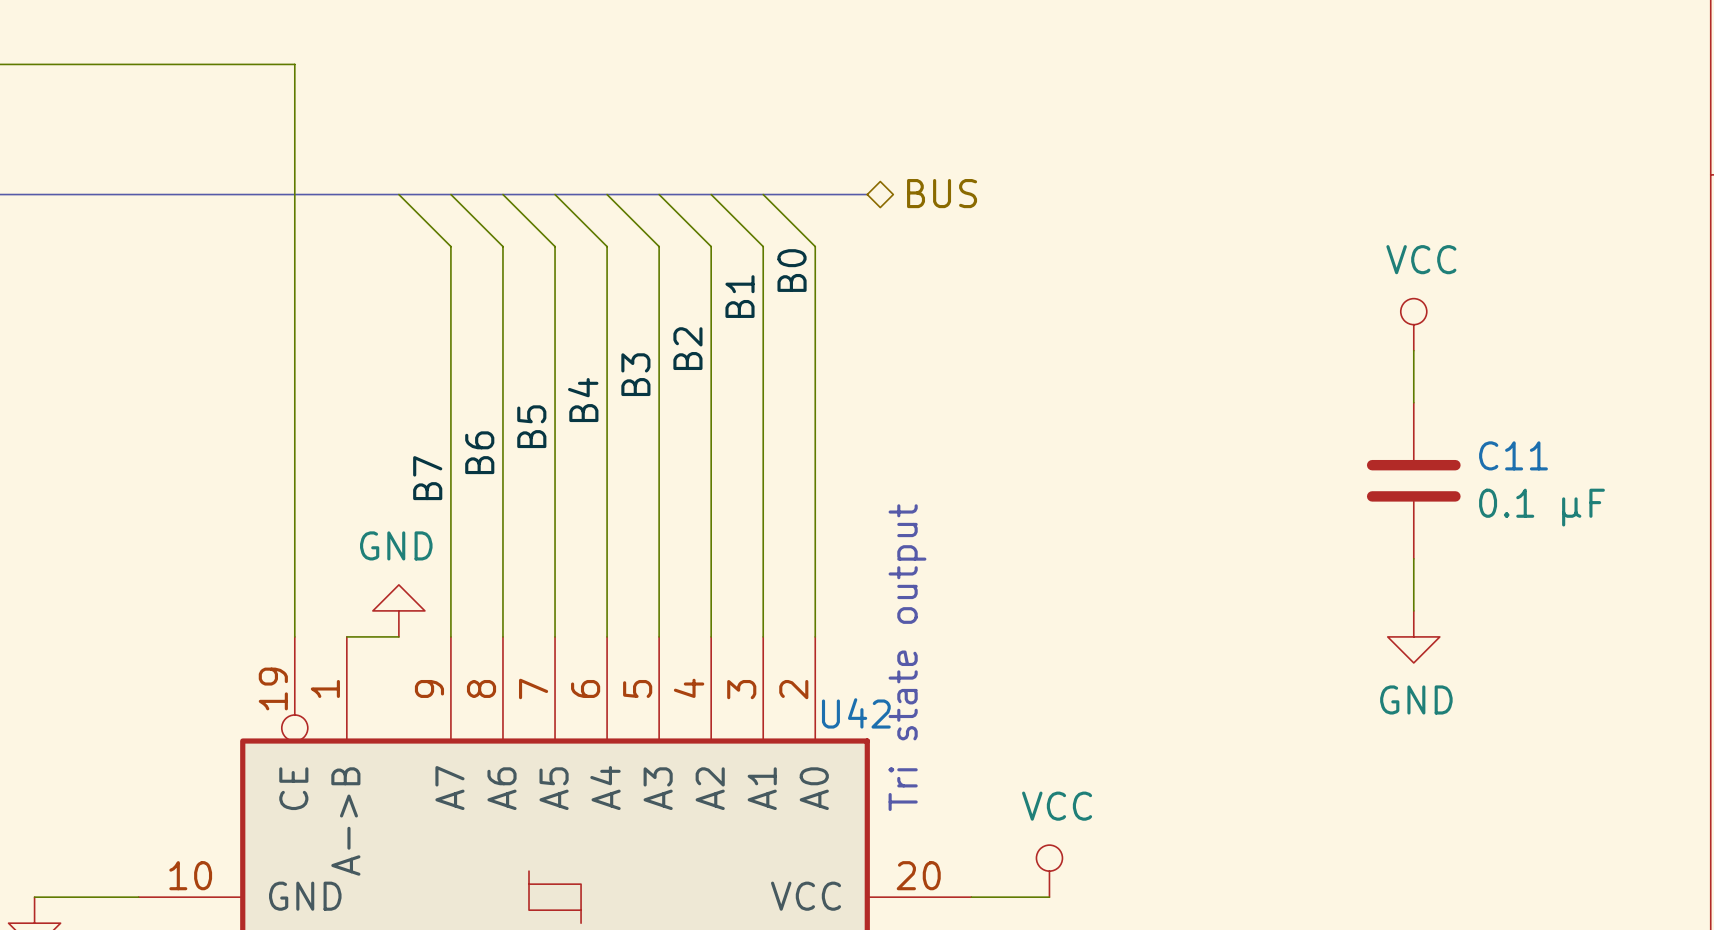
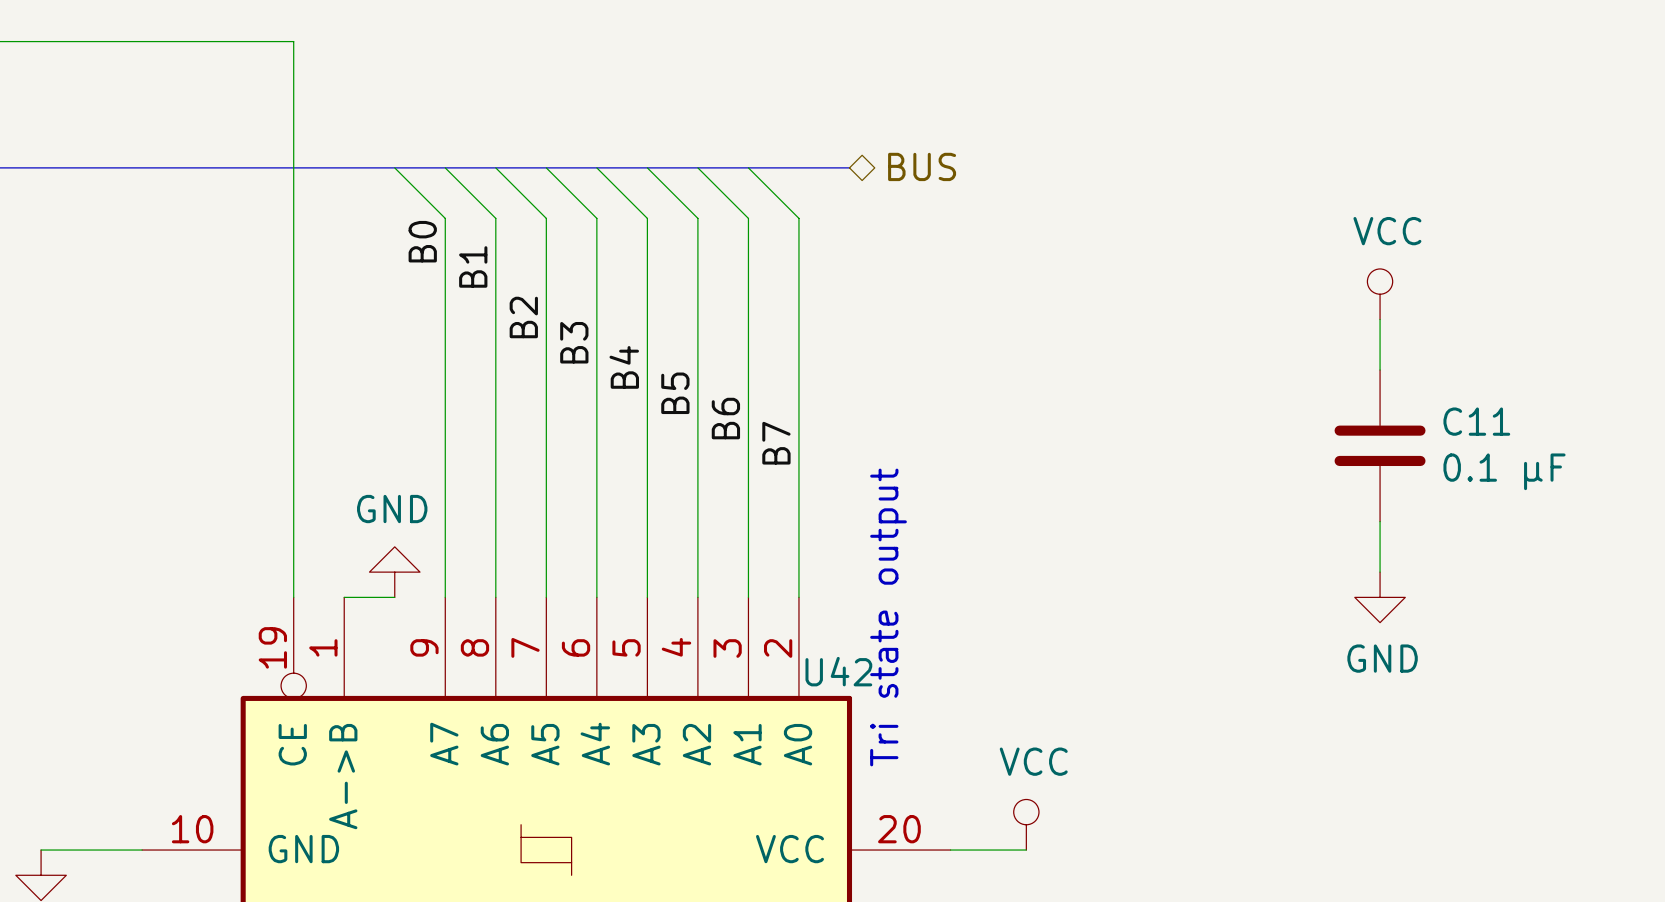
label position: B0 (792, 270) -> B0 (422, 241)
label position: B1 (739, 296) -> B1 (473, 266)
label position: B2 (687, 348) -> B2 (523, 317)
label position: B3 (635, 374) -> B3 (574, 342)
label position: B4 (583, 400) -> B4 (624, 367)
label position: B5 (531, 426) -> B5 (675, 393)
label position: B6 (479, 452) -> B6 (725, 418)
label position: B7 (427, 478) -> B7 (776, 443)

